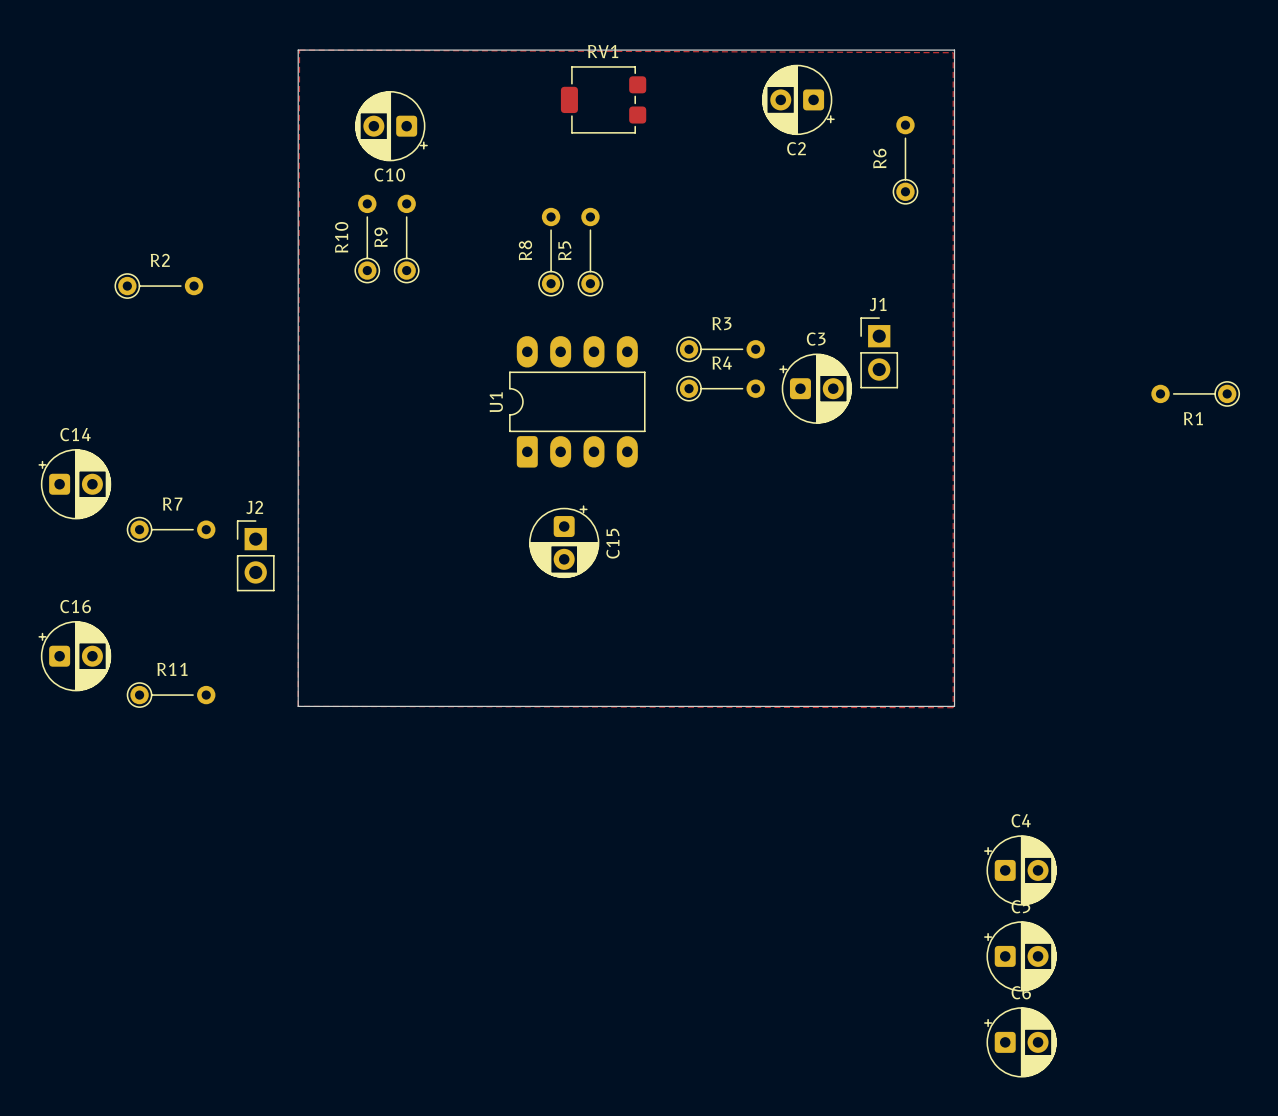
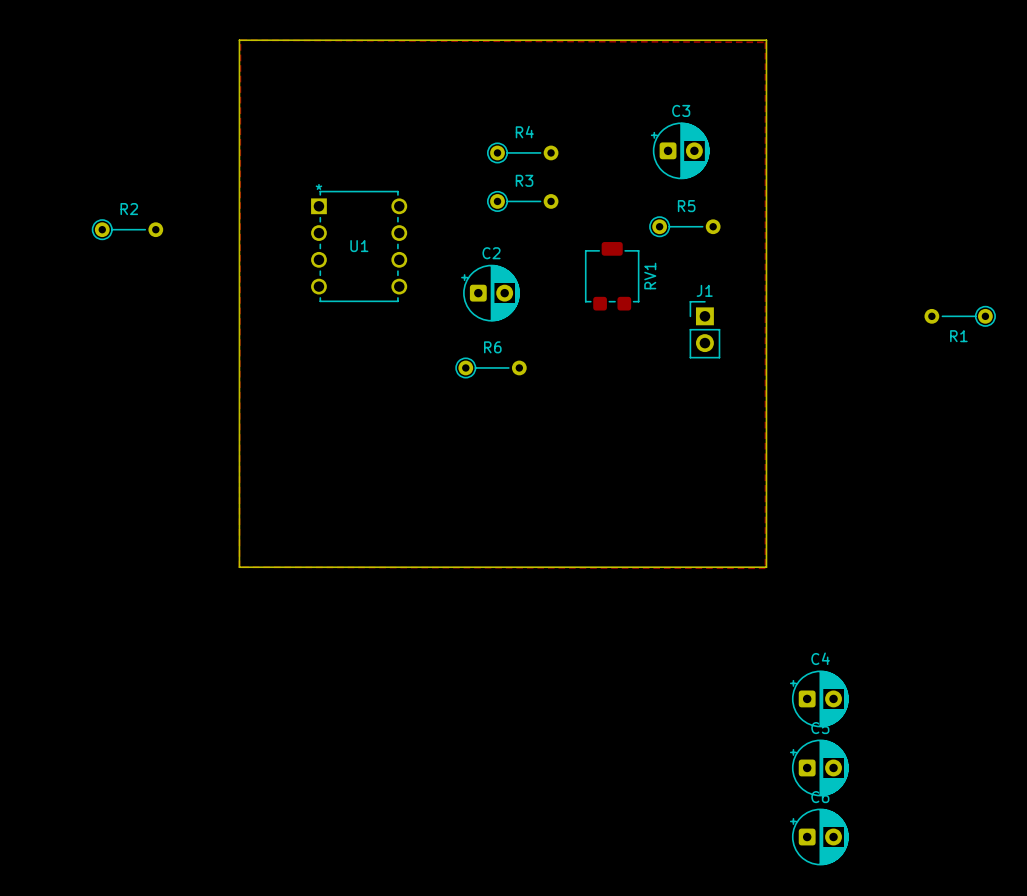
RV1 rotation: 0° (603, 99) -> 90° clockwise (612, 276)
RV1 position: (603, 99) -> (612, 276)
C2 rotation: 0° (798, 99) -> 180° (490, 293)
C2 position: (798, 99) -> (490, 293)
C10: (391, 126) -> none
R6 rotation: 0° (905, 160) -> 90° clockwise (491, 367)
R6 position: (905, 160) -> (491, 367)
R10: (367, 239) -> none
R9: (406, 239) -> none
R8: (551, 252) -> none
R5 rotation: 0° (590, 252) -> 90° clockwise (684, 226)
R5 position: (590, 252) -> (684, 226)
U1 footprint: [509, 336, 646, 468] -> [311, 190, 408, 303]
R3 position: (720, 349) -> (522, 201)
J1 position: (879, 352) -> (704, 329)
R4 position: (720, 388) -> (522, 152)
C3 position: (815, 388) -> (680, 150)
U1 name position: U1 (496, 402) -> U1 (359, 246)
C14: (74, 484) -> none
R7: (171, 529) -> none
C15: (564, 541) -> none
J2: (255, 555) -> none
C16: (74, 656) -> none
R11: (171, 695) -> none

